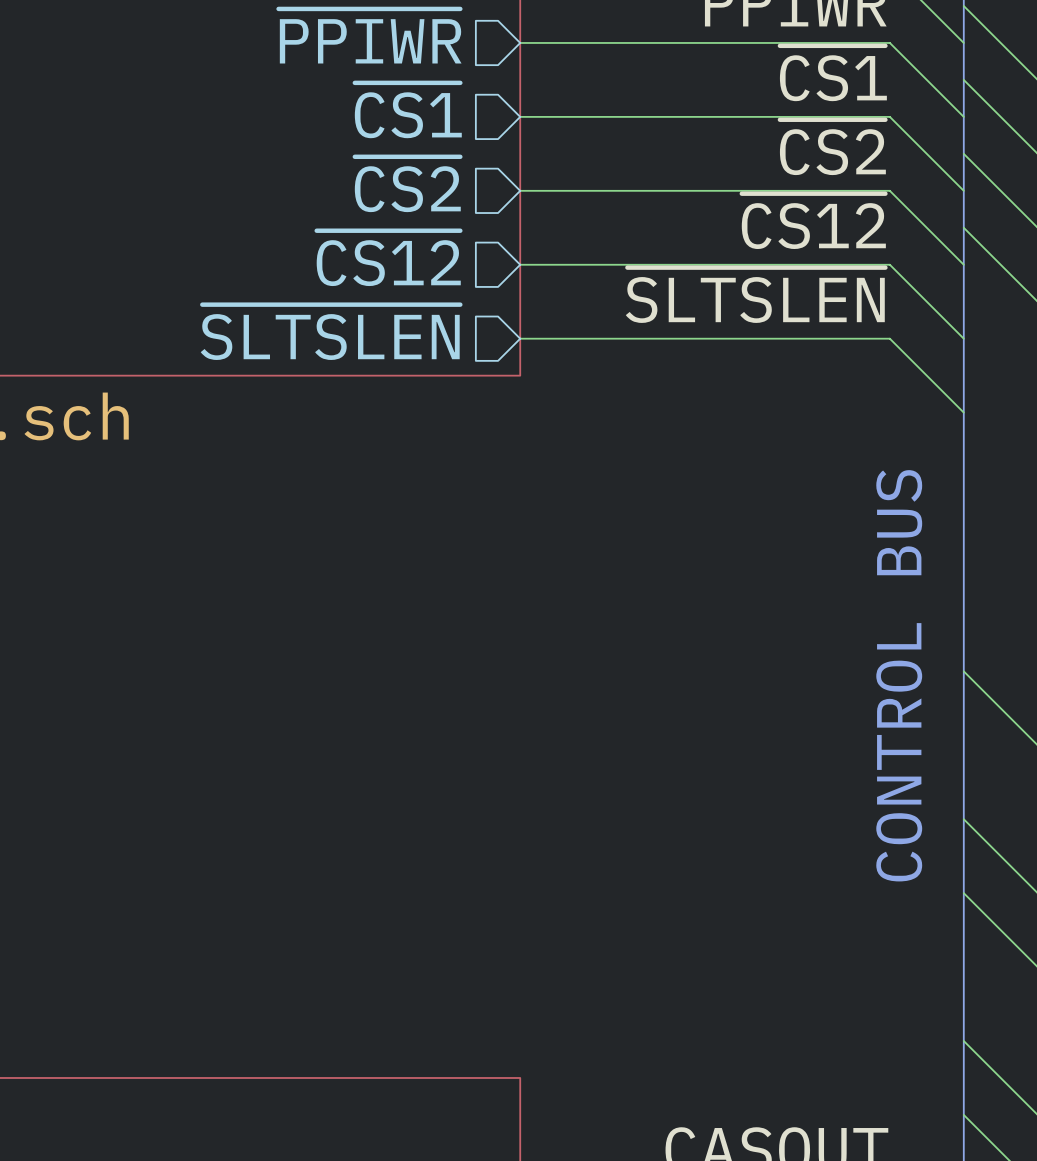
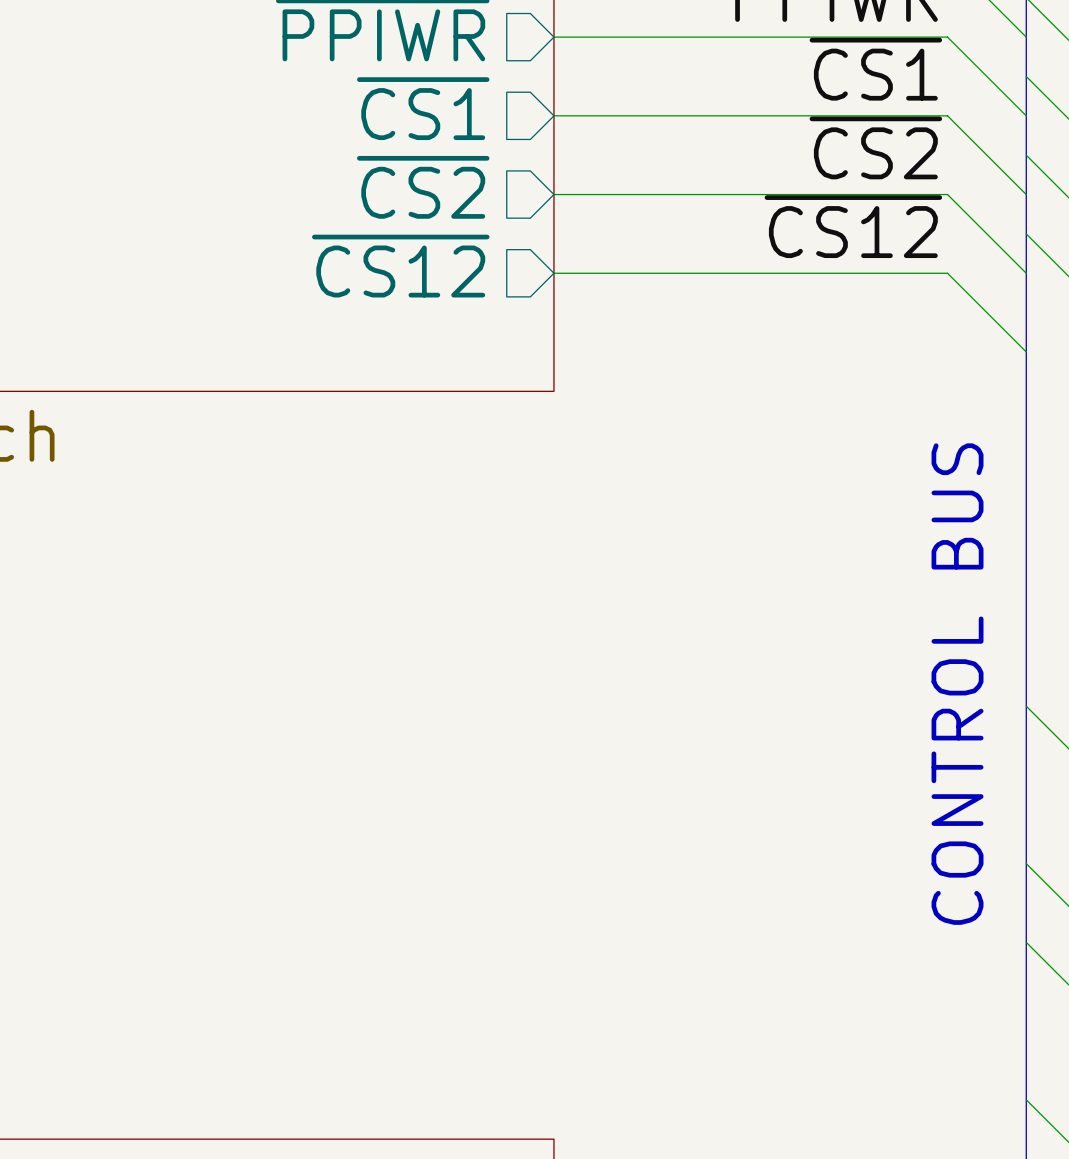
label: ~{SLTSLEN} (755, 295) -> none
sheet pin: ~{SLTSLEN} (330, 332) -> none
wire: (520, 338) (889, 338) (963, 412) -> none

